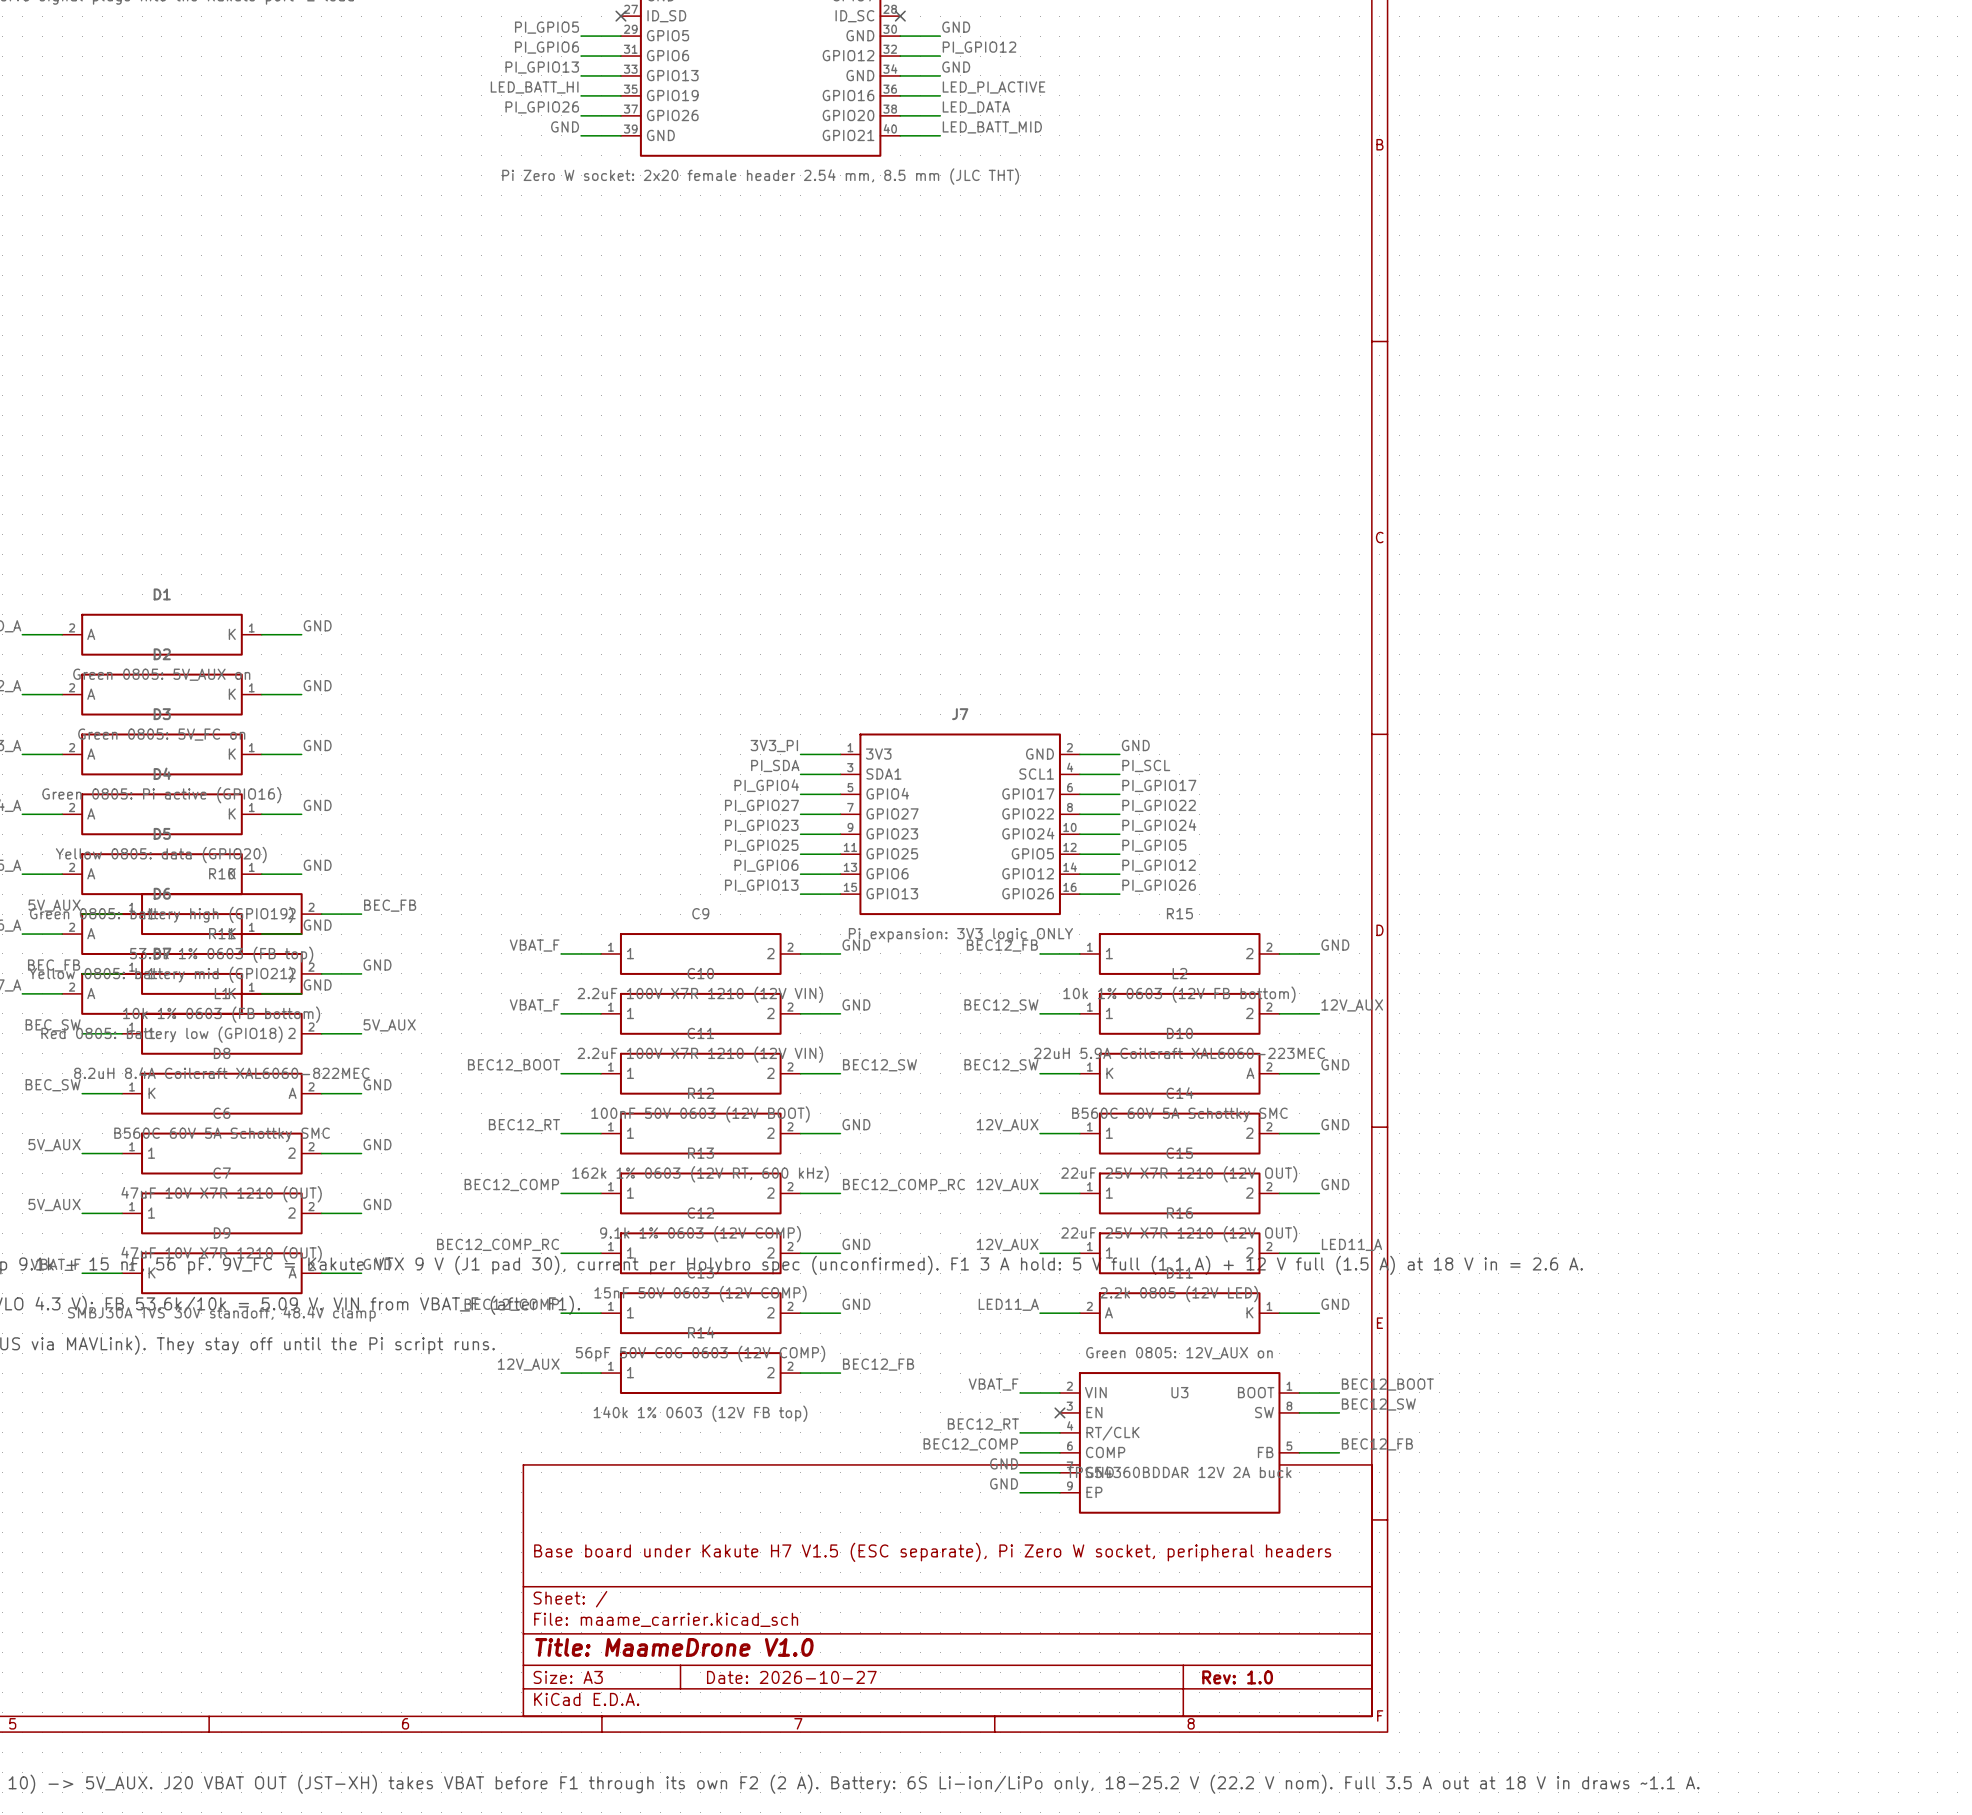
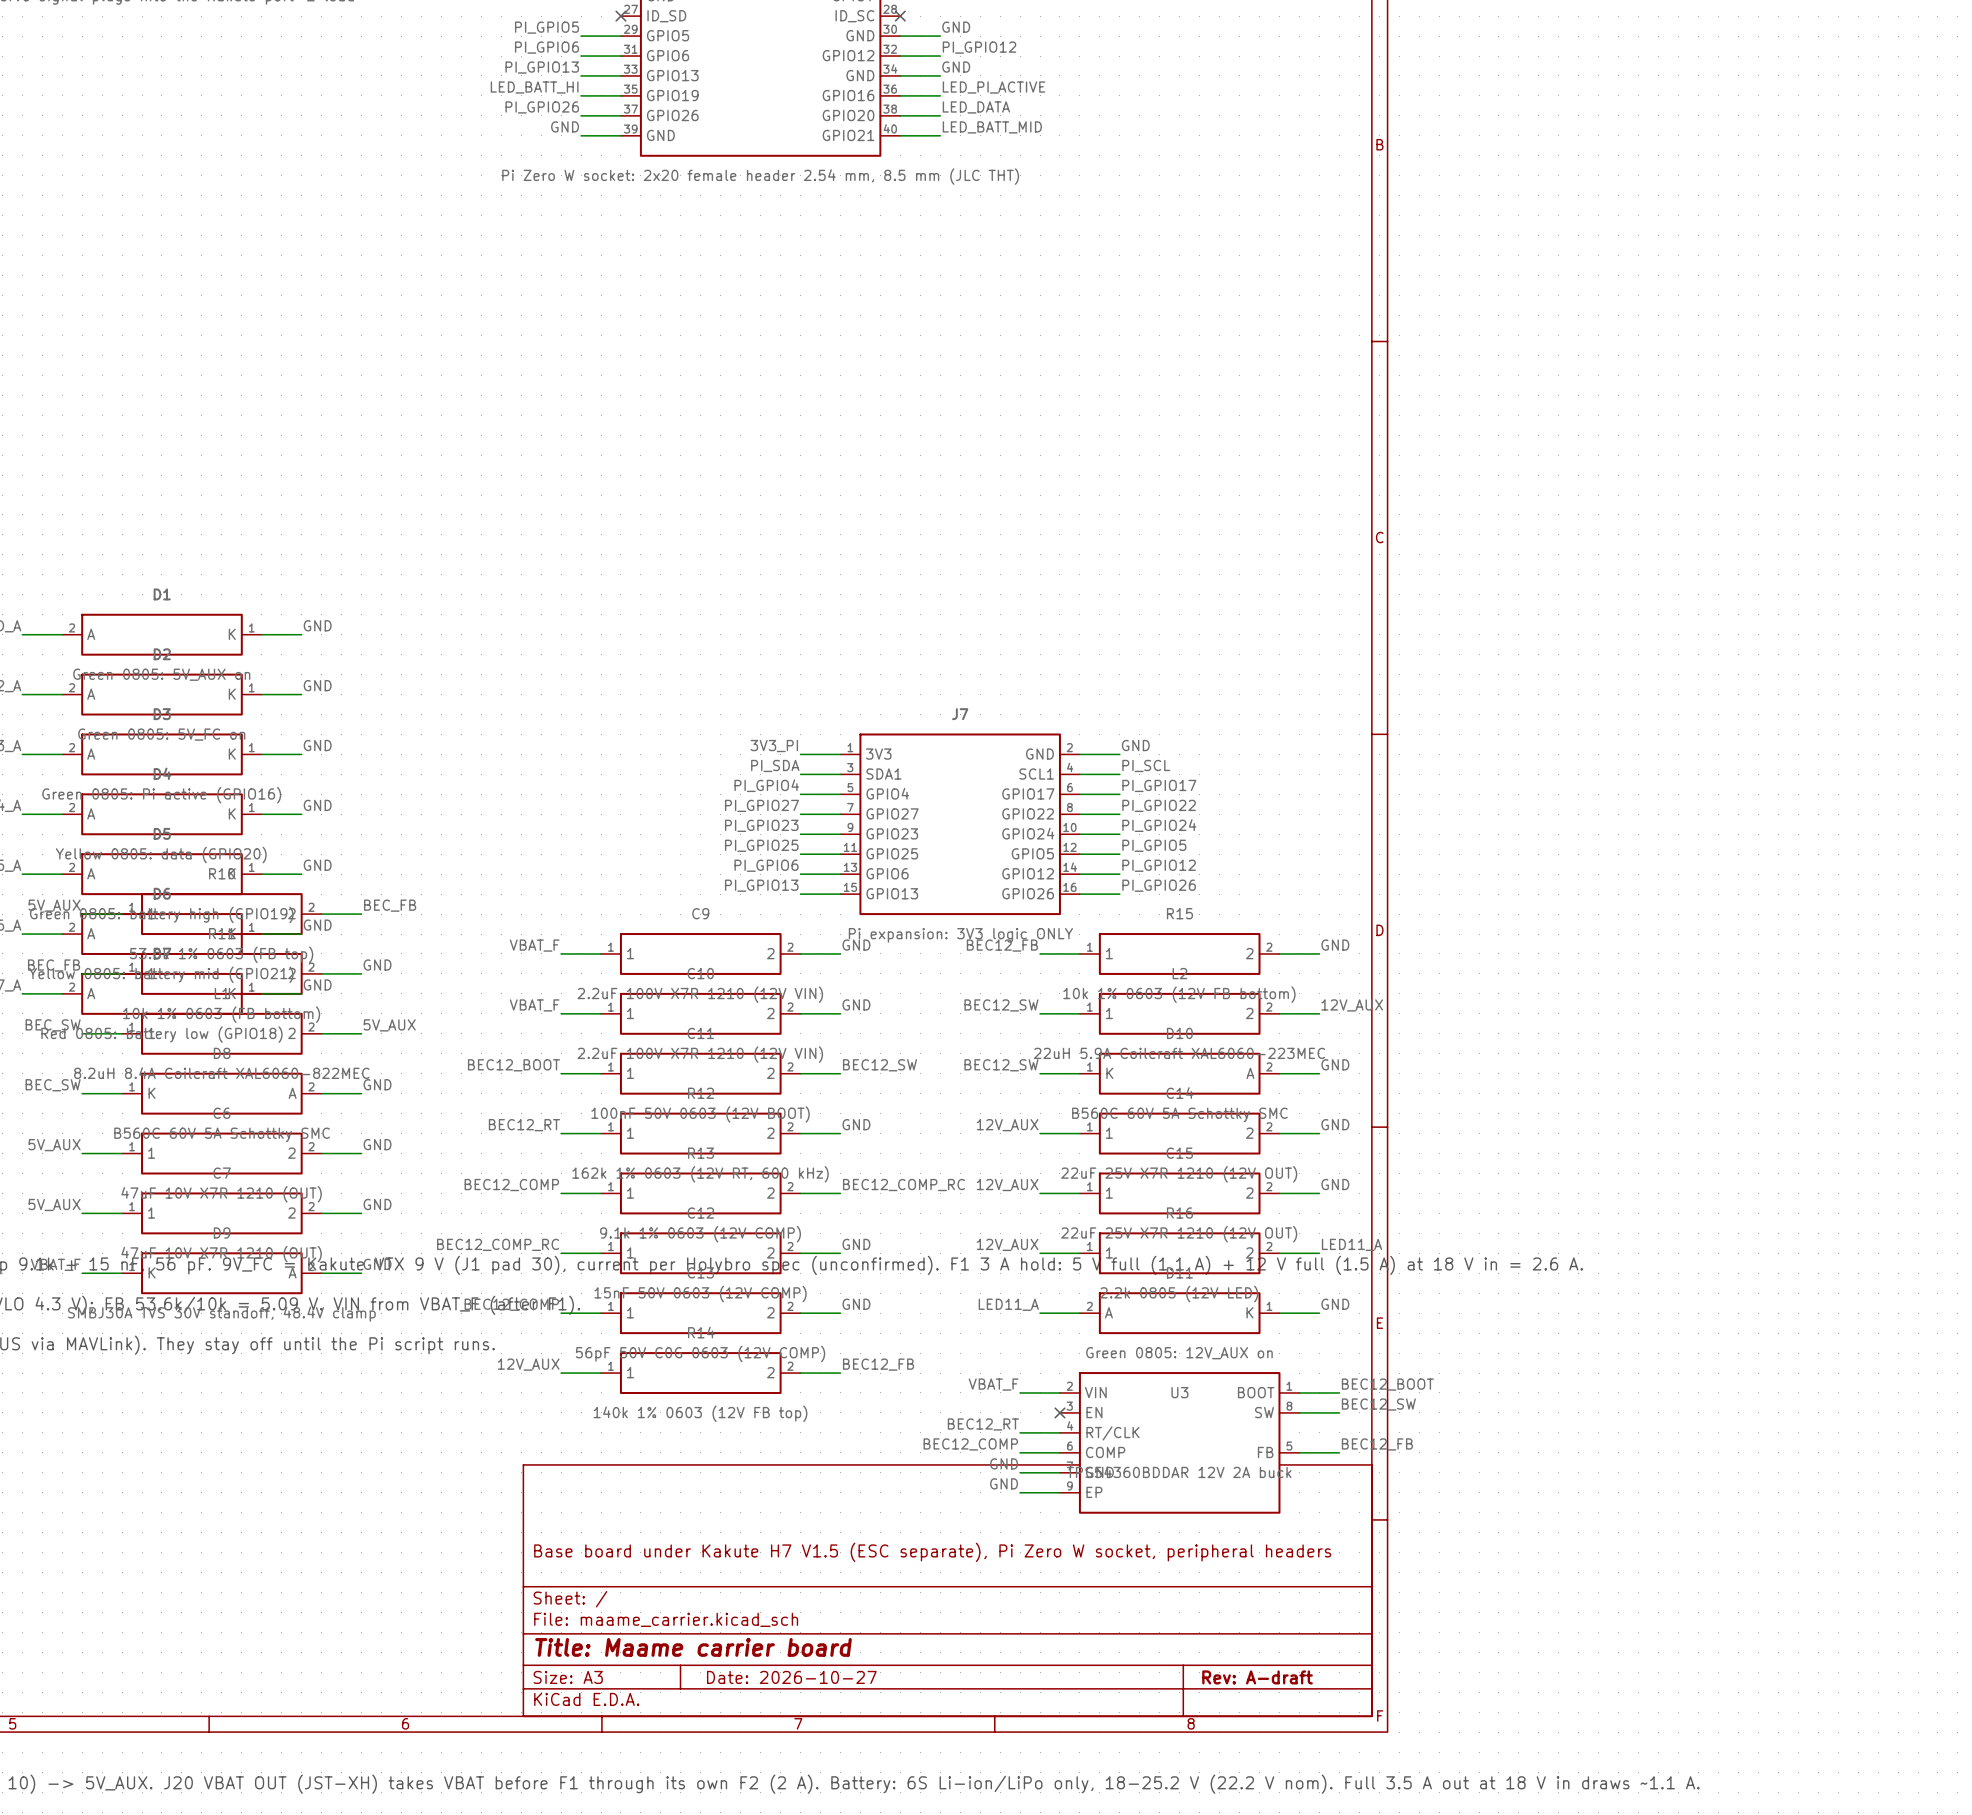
title block: Title: MaameDrone V1.0 (674, 1647) -> Title: Maame carrier board (693, 1647)
title block: Rev: 1.0 (1237, 1677) -> Rev: A-draft (1257, 1677)

